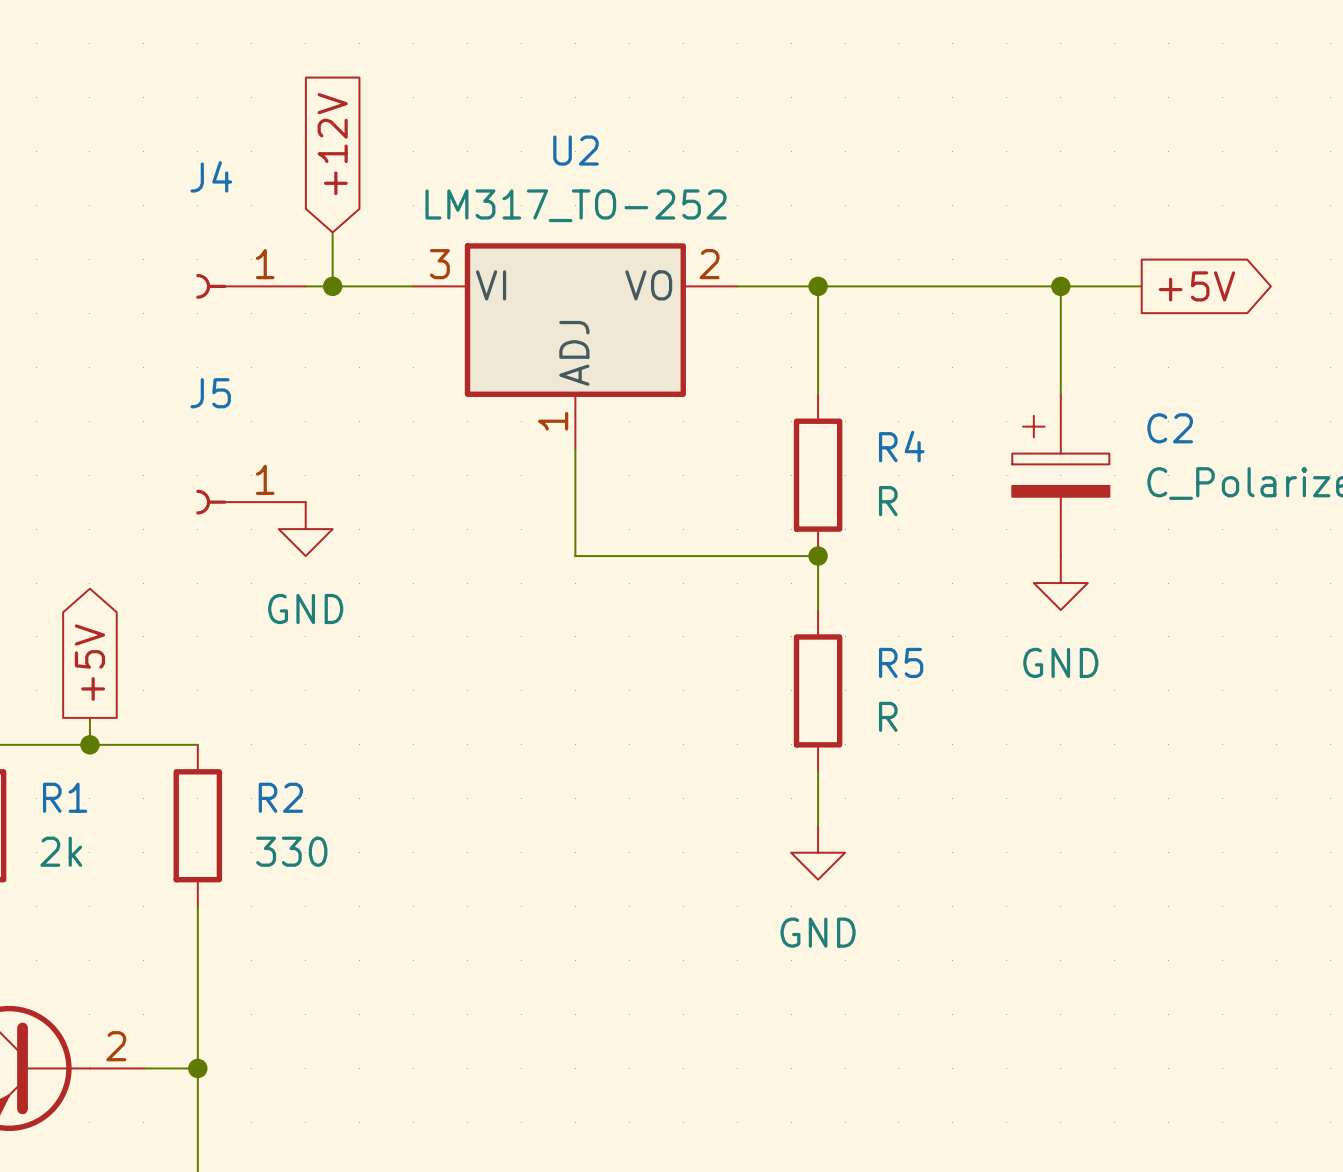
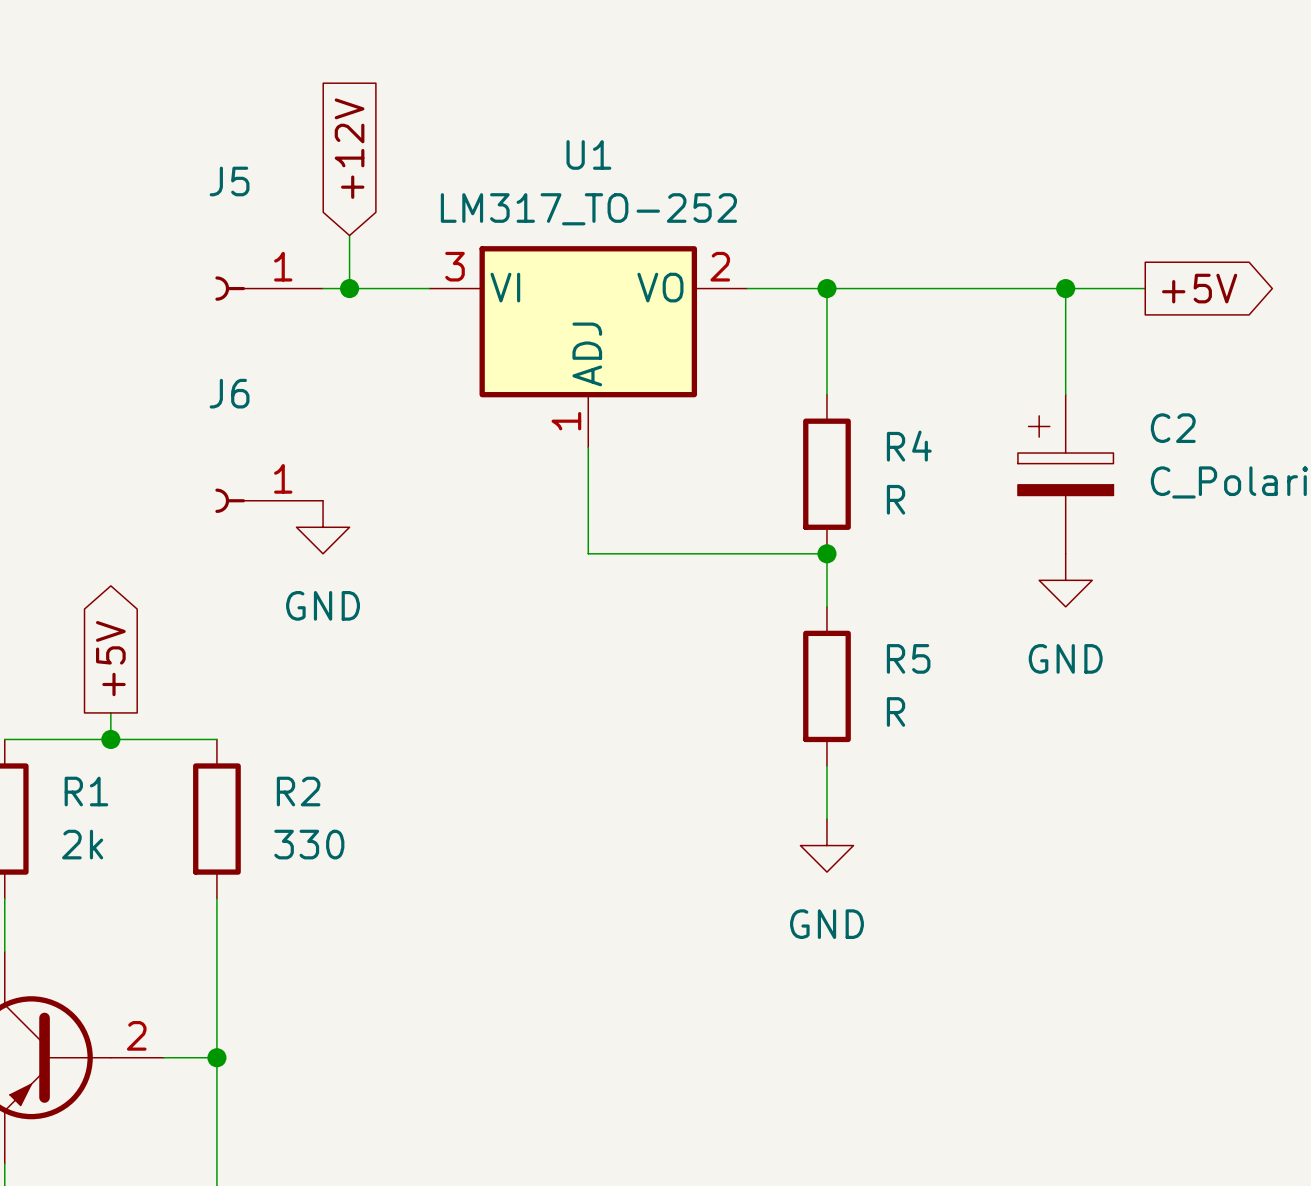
U2 name: U2 (576, 150) -> U1 (588, 154)
J4 name: J4 (211, 176) -> J5 (229, 181)
J5 name: J5 (210, 393) -> J6 (229, 393)

